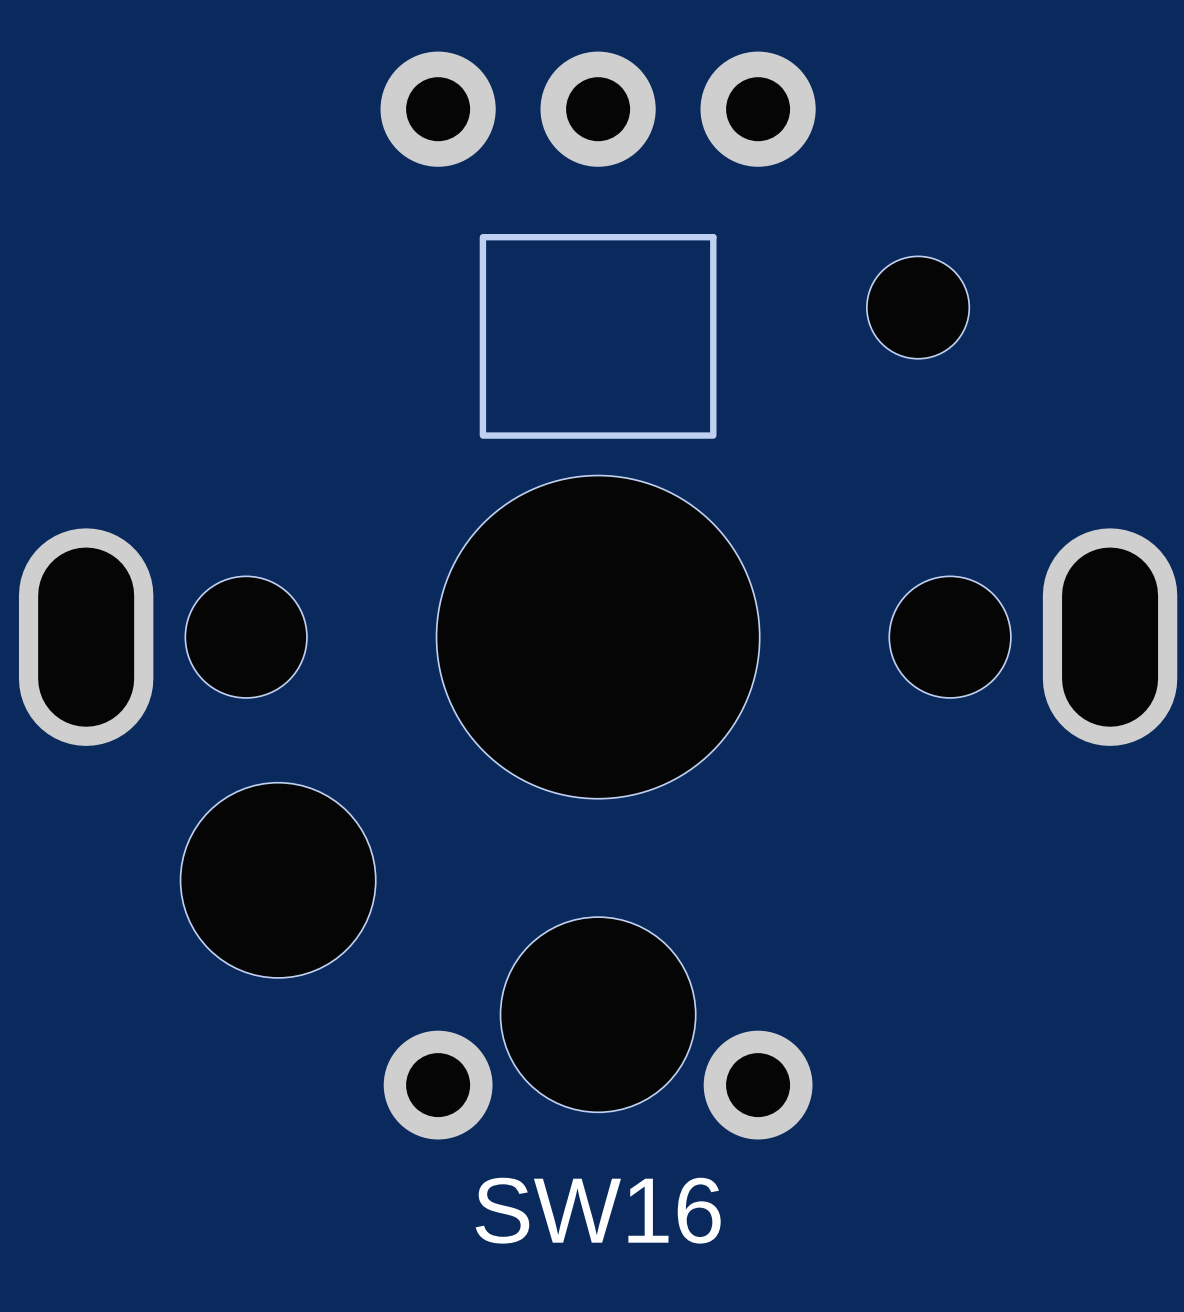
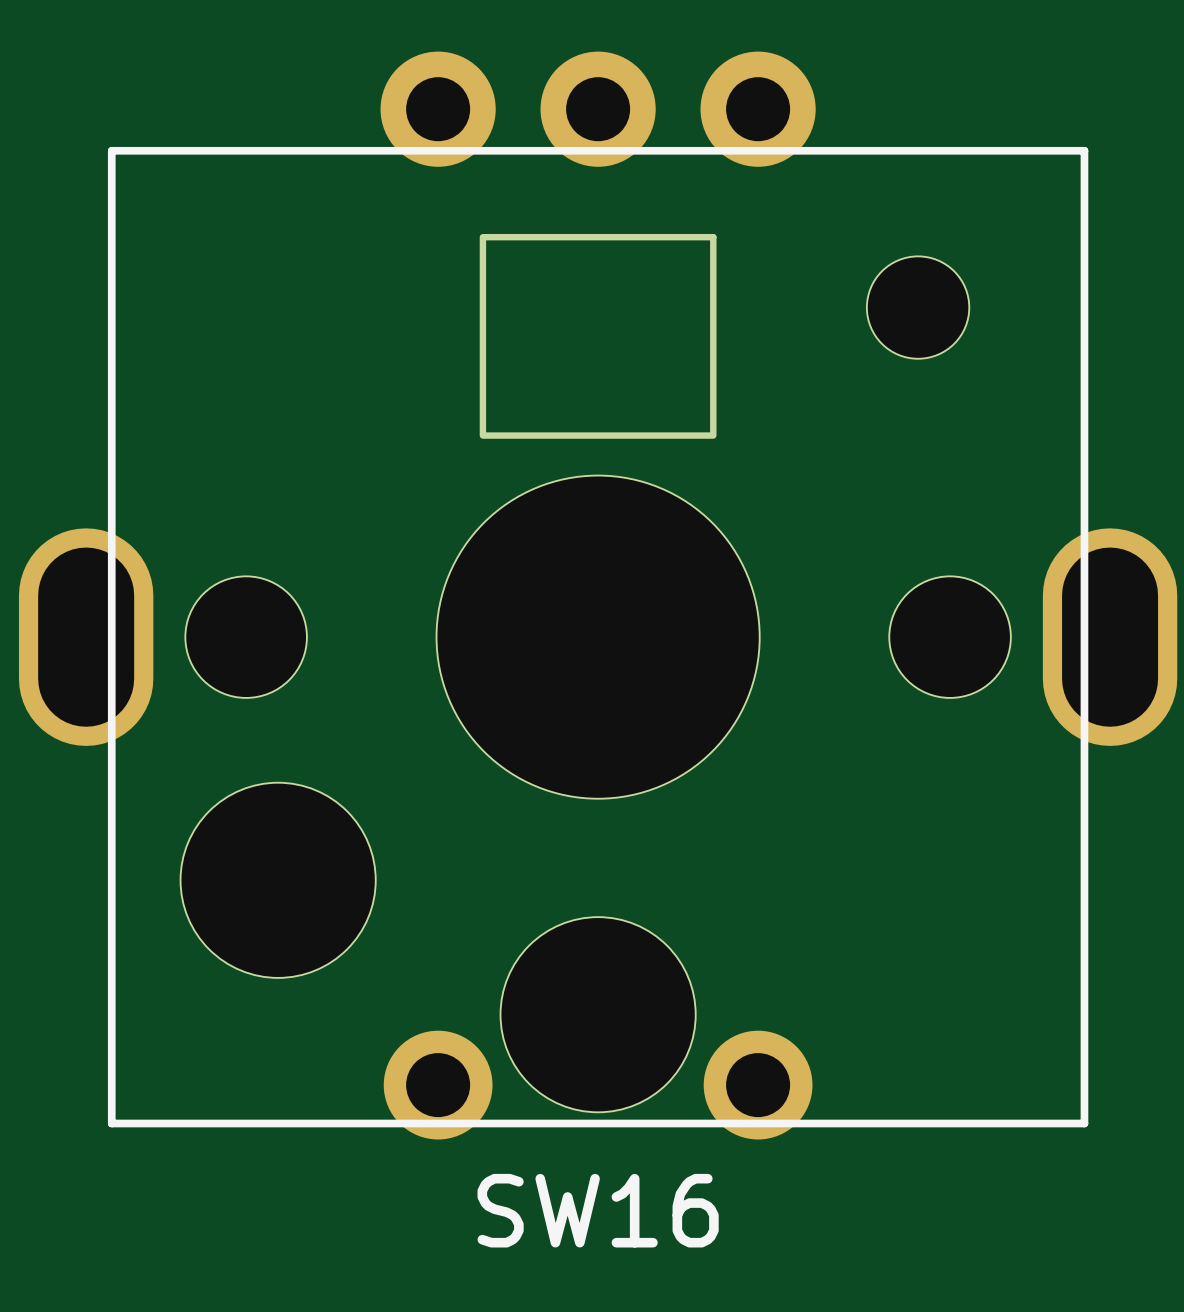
SW16 footprint: [18, 51, 1178, 1140] -> [18, 51, 1178, 1140]

